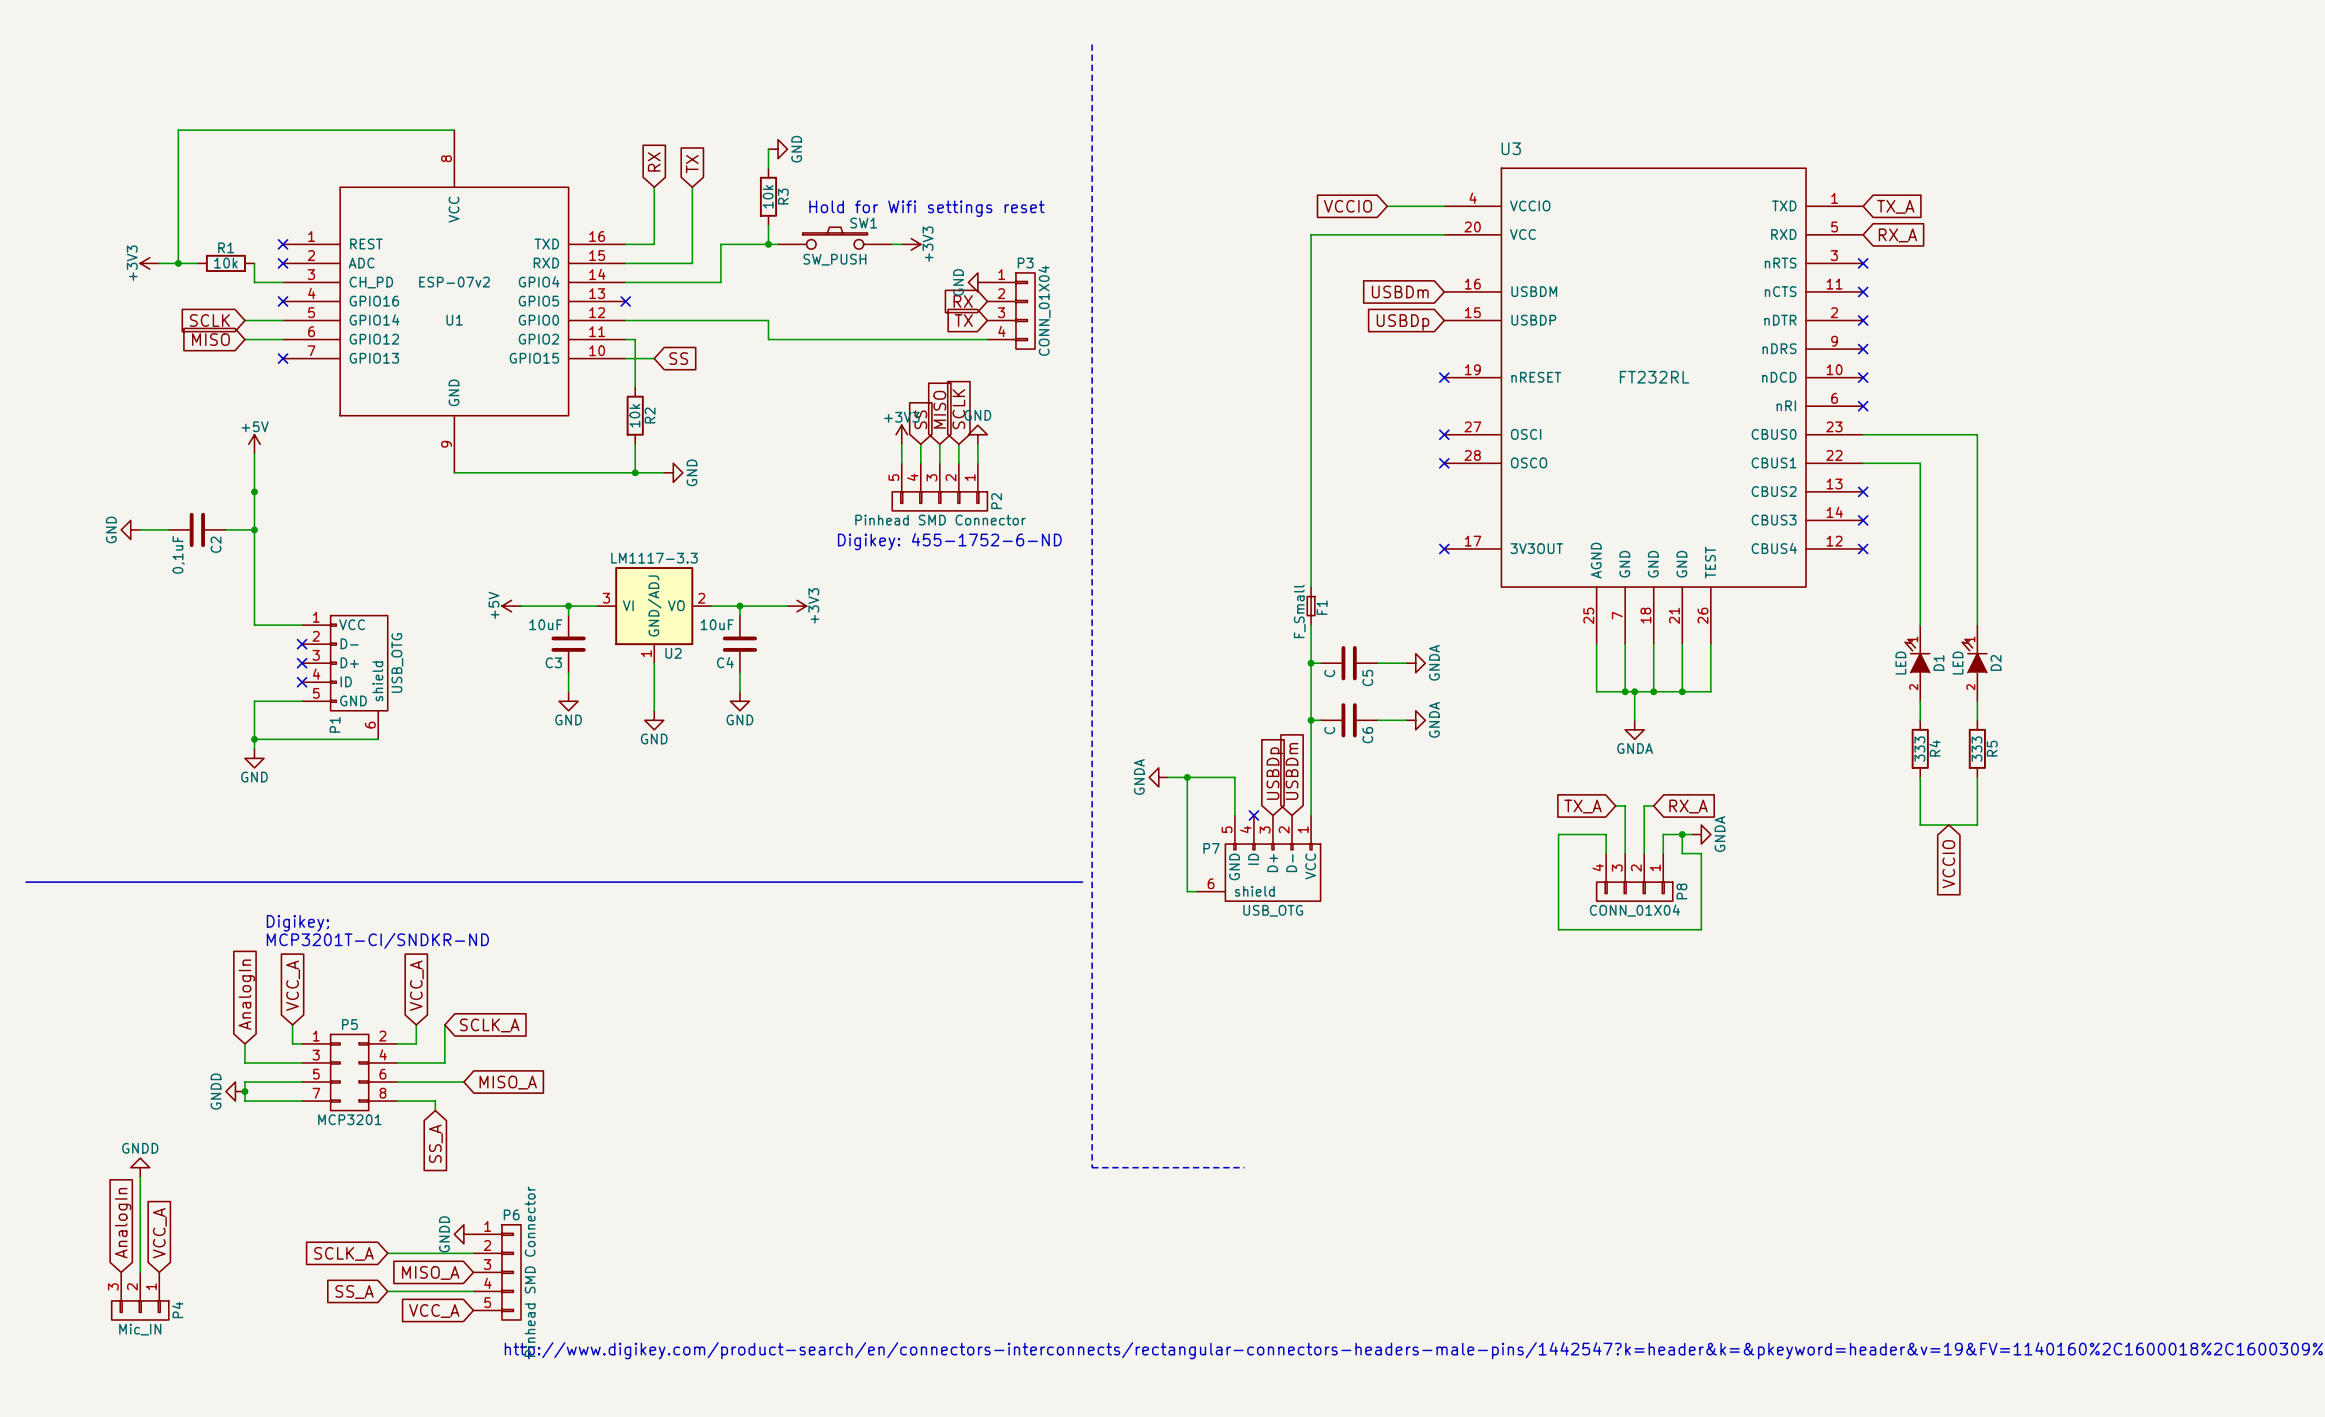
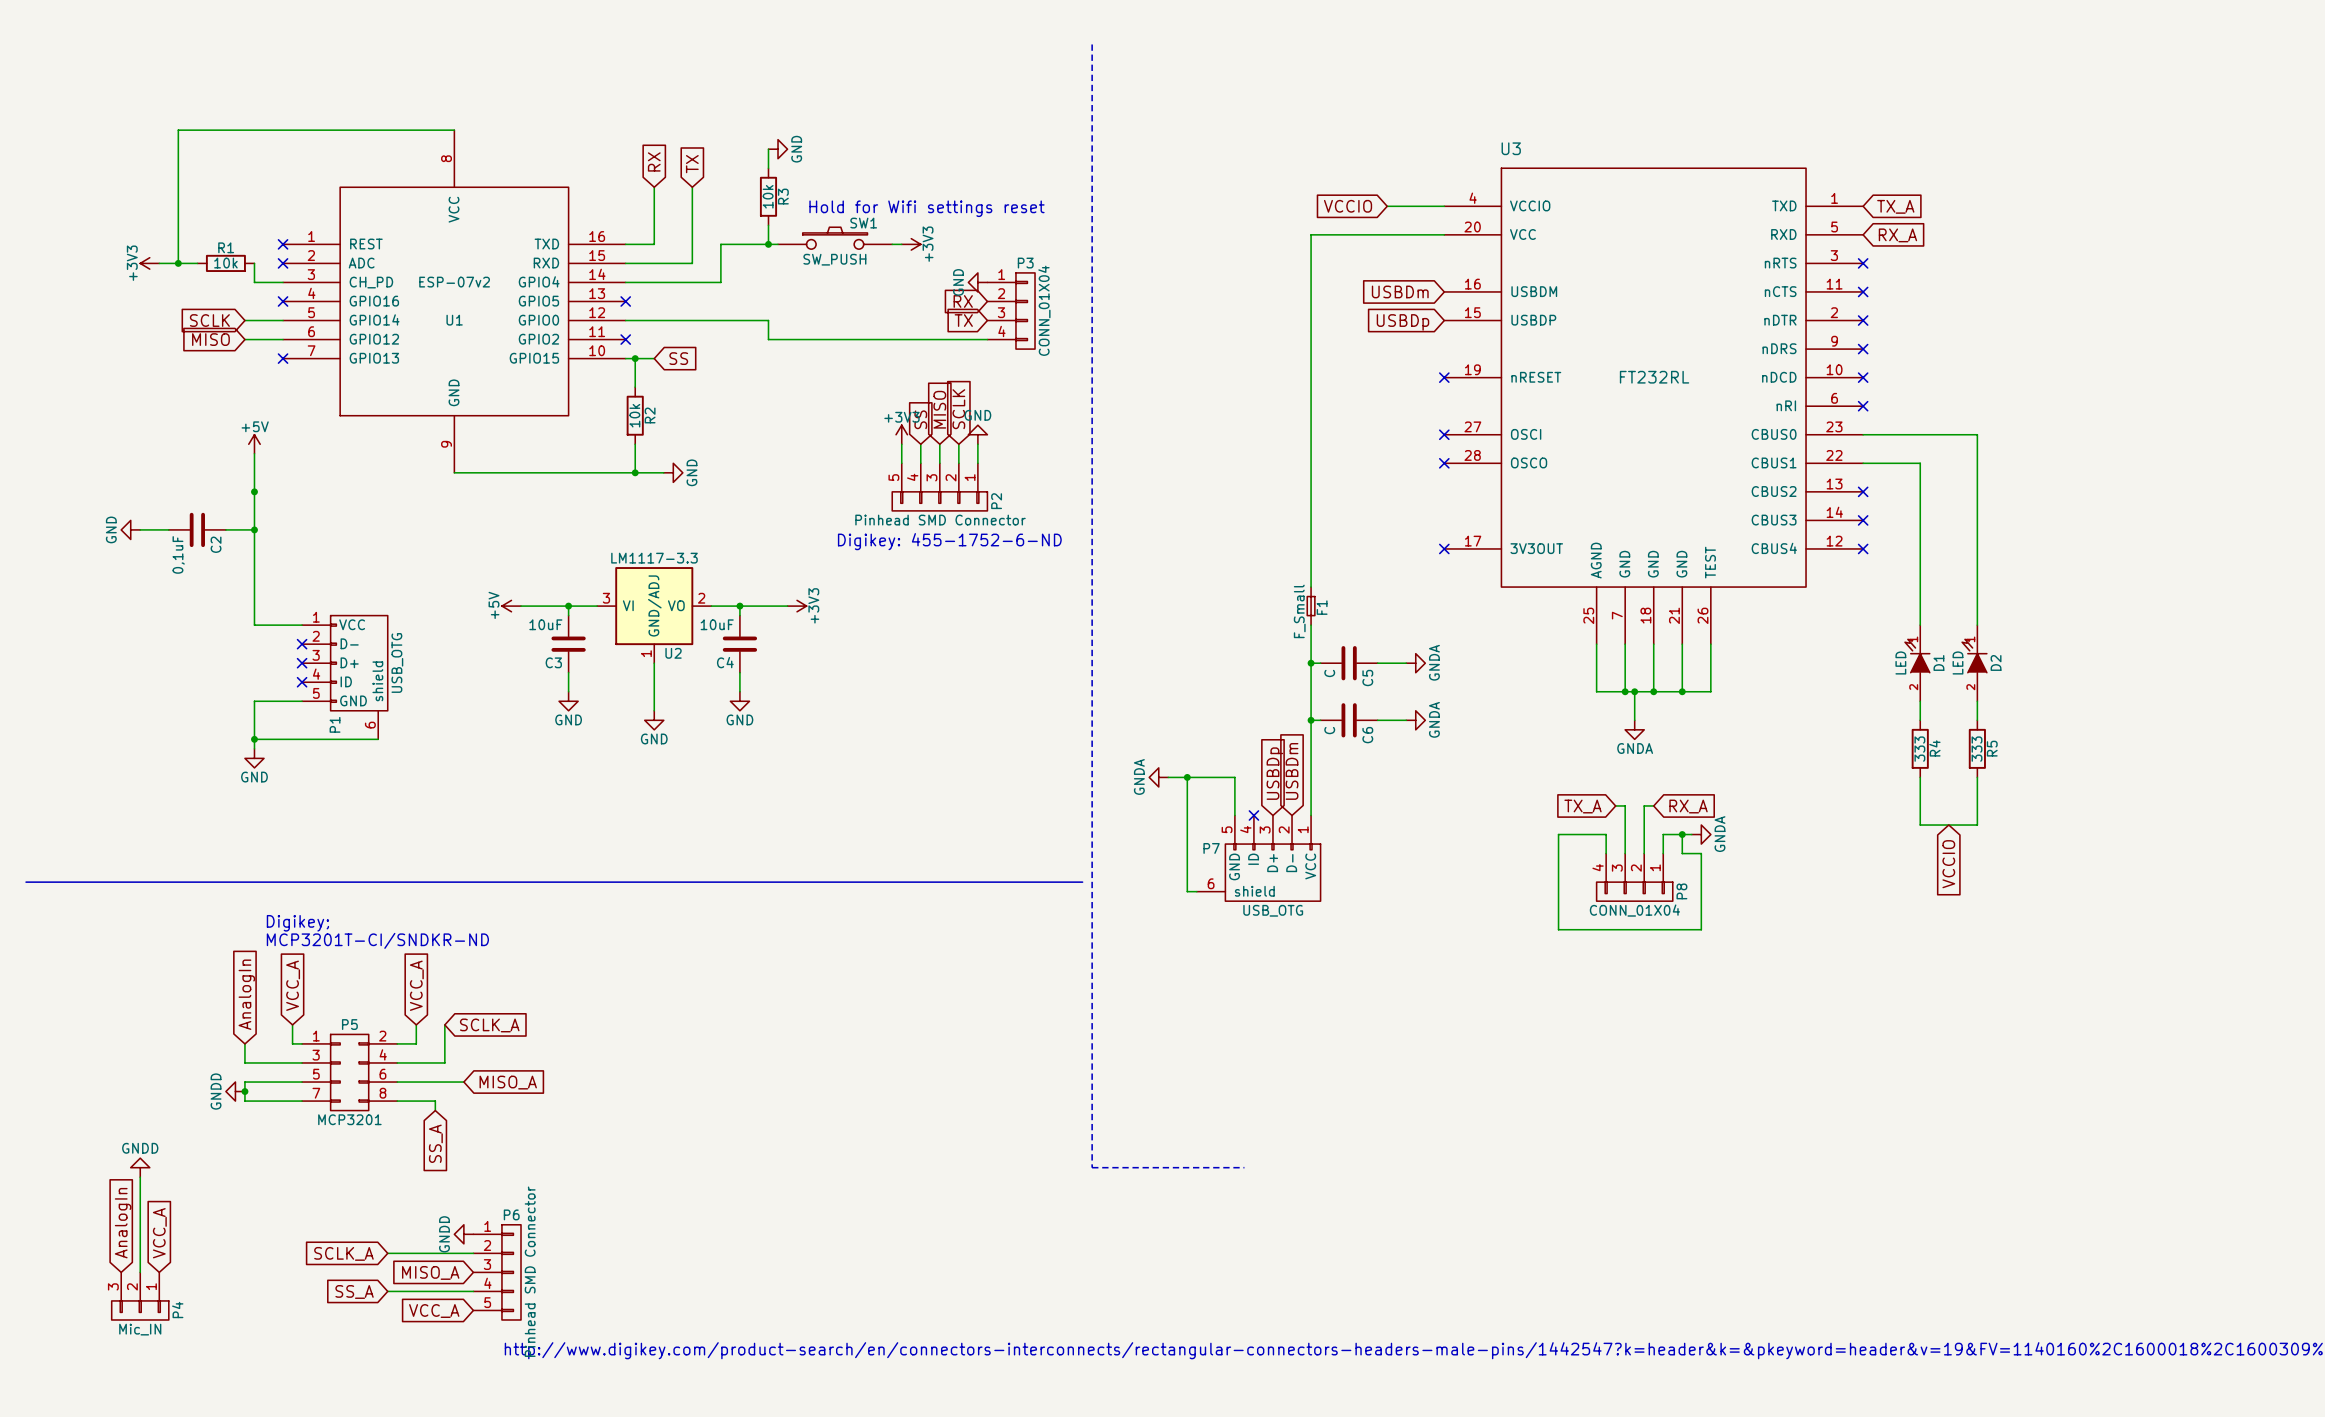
wire: (625, 339) (635, 339) (635, 358) -> none
no-connect mark: none -> (625, 339)
junction: none -> (635, 358)

